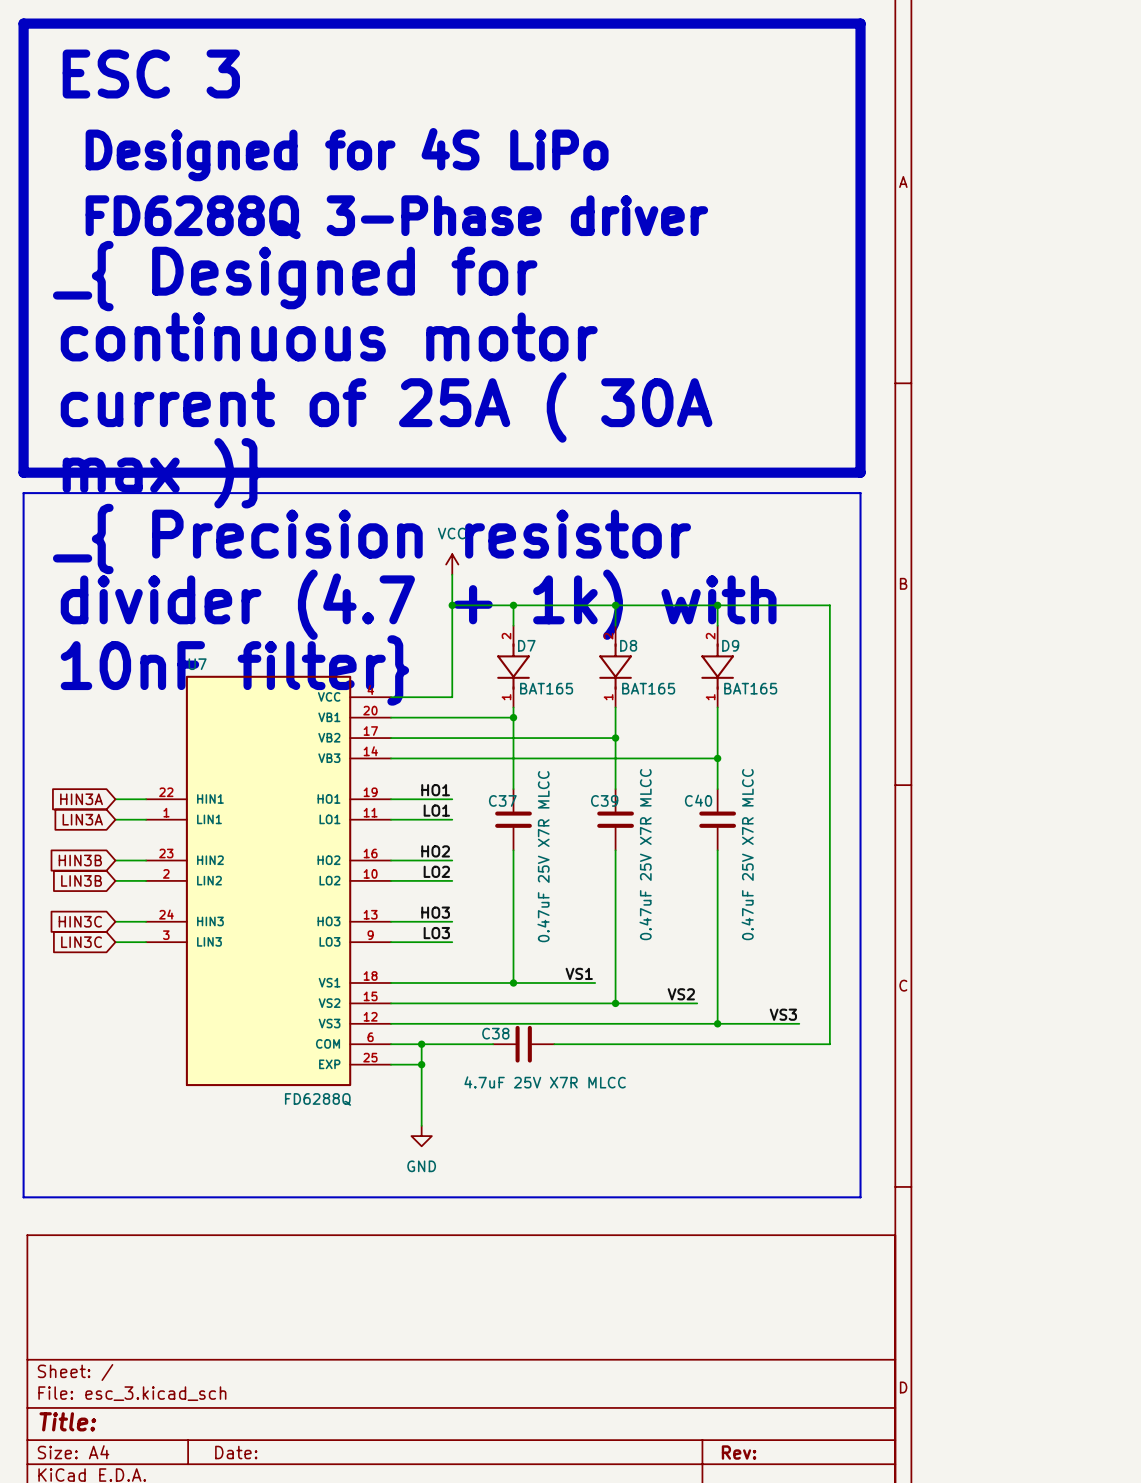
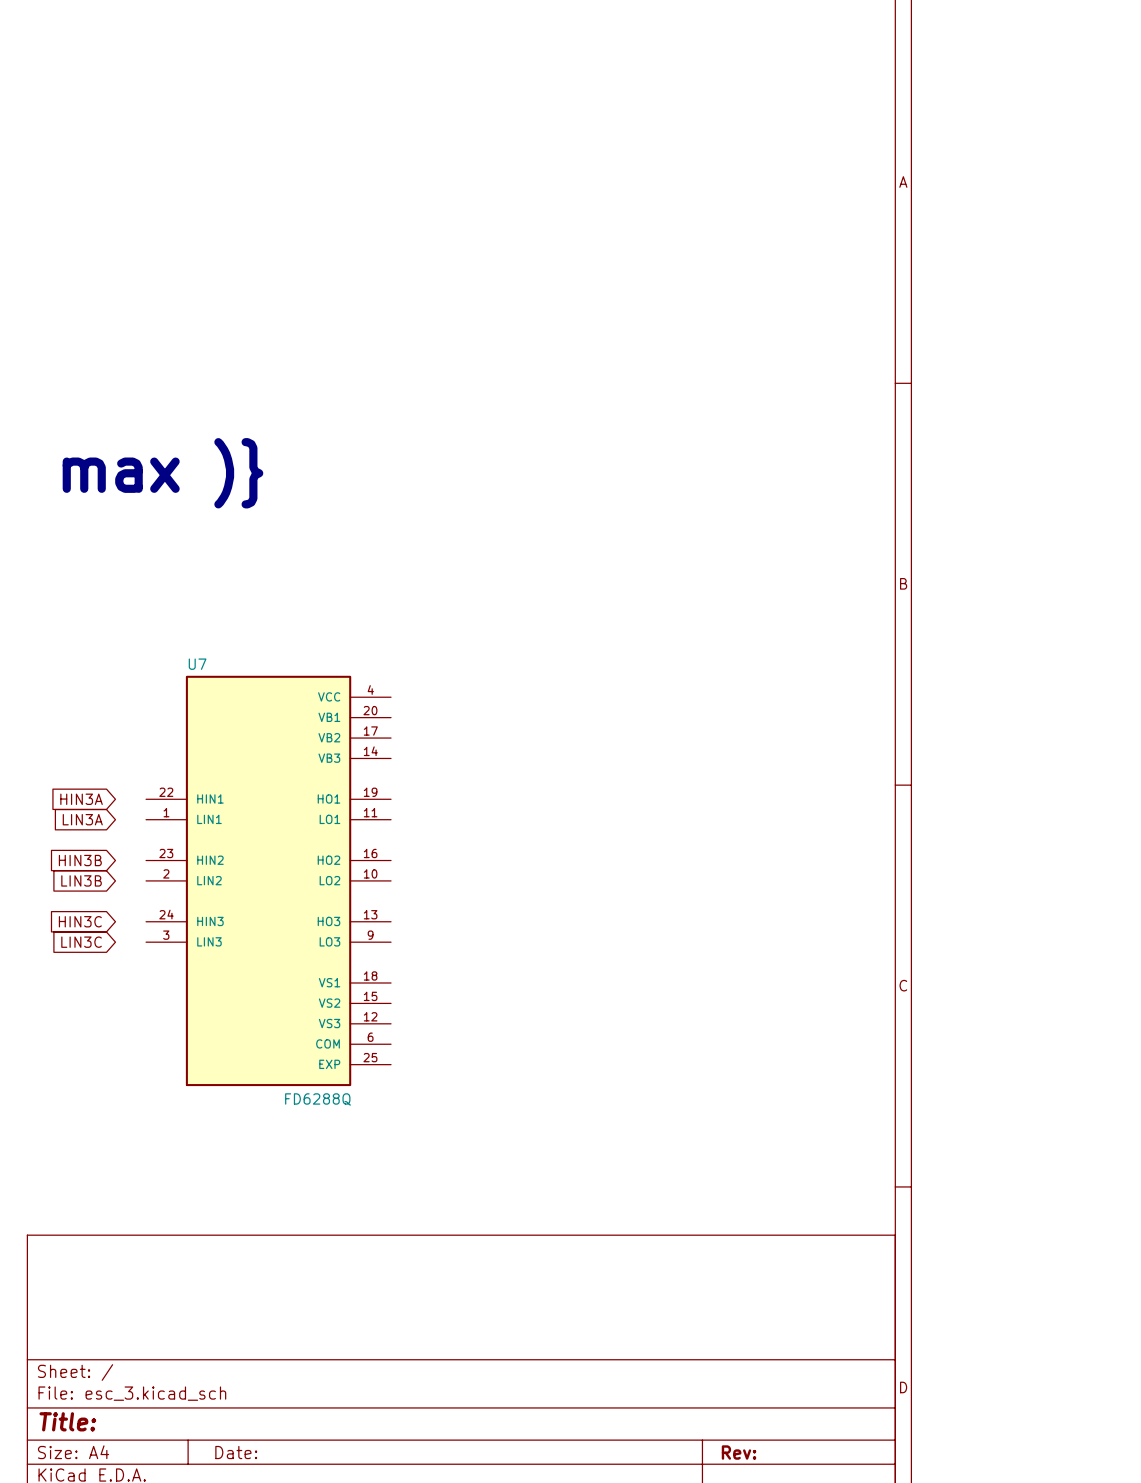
line: (23, 23) (860, 23) (860, 472) (23, 472) (23, 23) -> none
text: ESC 3 (151, 74) -> none
text: Designed for 4S LiPo (347, 154) -> none
text: FD6288Q 3-Phase driver (396, 217) -> none
text: _{ Designed for (295, 276) -> none
text: continuous motor (329, 336) -> none
text: current of 25A ( 30A (386, 407) -> none
line: (23, 493) (860, 493) (860, 1197) (23, 1197) (23, 493) -> none
text: _{ Precision resistor (371, 538) -> none
power symbol: VCC (452, 564) -> none
wire: (452, 574) (452, 697) (391, 697) -> none
text: divider (4.7 + 1k) with (418, 604) -> none
wire: (452, 605) (829, 605) (829, 1044) (554, 1044) -> none
junction: (452, 605) -> none
wire: (513, 605) (513, 625) -> none
junction: (513, 605) -> none
wire: (615, 605) (615, 625) -> none
junction: (615, 605) -> none
wire: (717, 605) (717, 625) -> none
junction: (717, 605) -> none
D7: BAT165 (513, 666) -> none
D8: BAT165 (615, 666) -> none
D9: BAT165 (717, 666) -> none
text: 10nF filter} (234, 670) -> none
wire: (513, 707) (513, 789) -> none
wire: (615, 707) (615, 789) -> none
wire: (717, 707) (717, 789) -> none
wire: (391, 717) (513, 717) -> none
junction: (513, 717) -> none
wire: (391, 738) (615, 738) -> none
junction: (615, 738) -> none
wire: (391, 758) (717, 758) -> none
junction: (717, 758) -> none
label: HO1 (435, 790) -> none
wire: (115, 799) (146, 799) -> none
wire: (391, 799) (452, 799) -> none
label: LO1 (436, 810) -> none
wire: (115, 819) (146, 819) -> none
wire: (391, 819) (452, 819) -> none
C37: 0.47uF 25V X7R MLCC (513, 819) -> none
C39: 0.47uF 25V X7R MLCC (615, 819) -> none
C40: 0.47uF 25V X7R MLCC (717, 819) -> none
wire: (513, 850) (513, 982) -> none
wire: (615, 850) (615, 1003) -> none
wire: (717, 850) (717, 1023) -> none
label: HO2 (435, 851) -> none
wire: (115, 860) (146, 860) -> none
wire: (391, 860) (452, 860) -> none
label: LO2 (436, 871) -> none
wire: (115, 880) (146, 880) -> none
wire: (391, 880) (452, 880) -> none
label: HO3 (435, 912) -> none
wire: (115, 921) (146, 921) -> none
wire: (391, 921) (452, 921) -> none
label: LO3 (436, 933) -> none
wire: (115, 942) (146, 942) -> none
wire: (391, 942) (452, 942) -> none
label: VS1 (579, 973) -> none
wire: (391, 982) (595, 982) -> none
junction: (513, 982) -> none
label: VS2 (681, 994) -> none
wire: (391, 1003) (697, 1003) -> none
junction: (615, 1003) -> none
label: VS3 (783, 1014) -> none
wire: (391, 1023) (799, 1023) -> none
junction: (717, 1023) -> none
wire: (391, 1044) (493, 1044) -> none
wire: (421, 1044) (421, 1125) -> none
junction: (421, 1044) -> none
C38: 4.7uF 25V X7R MLCC (523, 1044) -> none
wire: (391, 1064) (421, 1064) -> none
junction: (421, 1064) -> none
power symbol: GND (421, 1136) -> none

